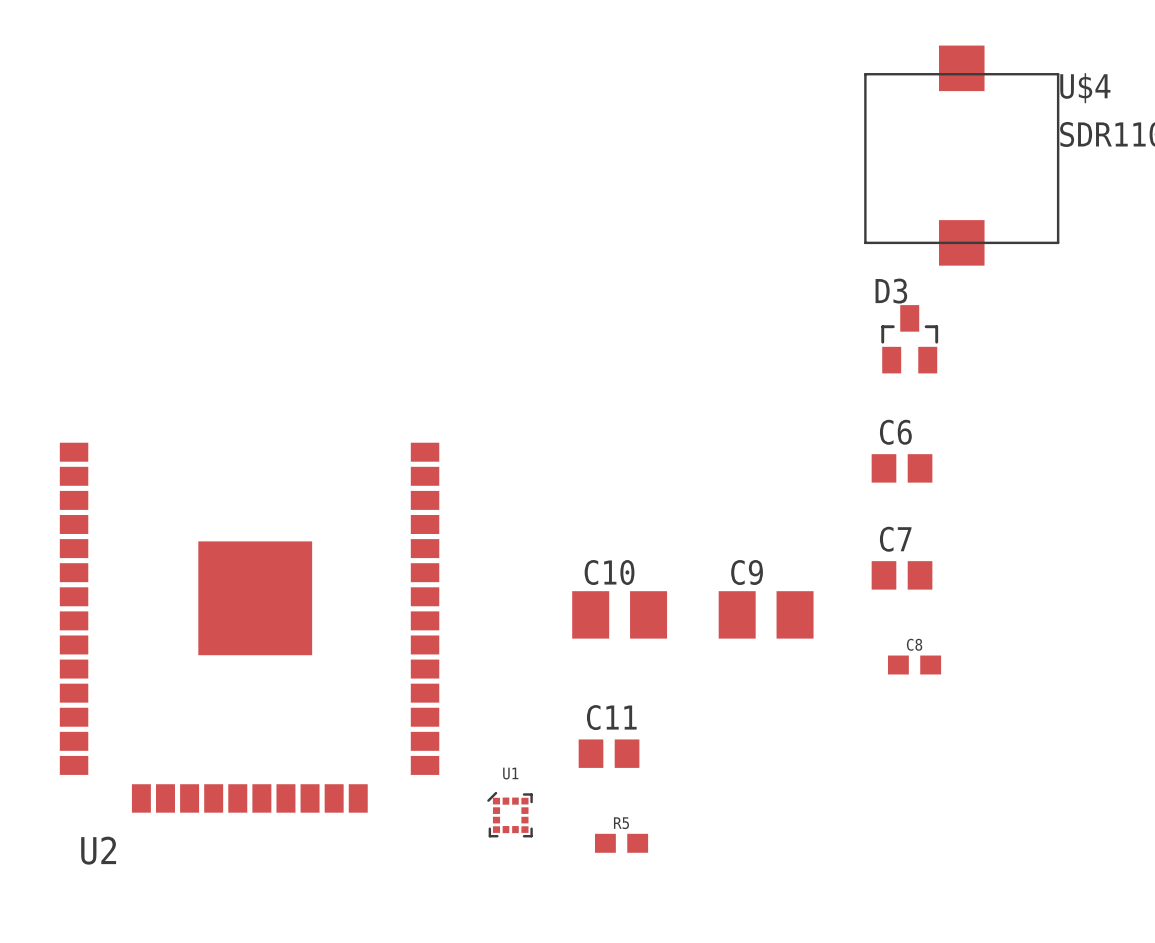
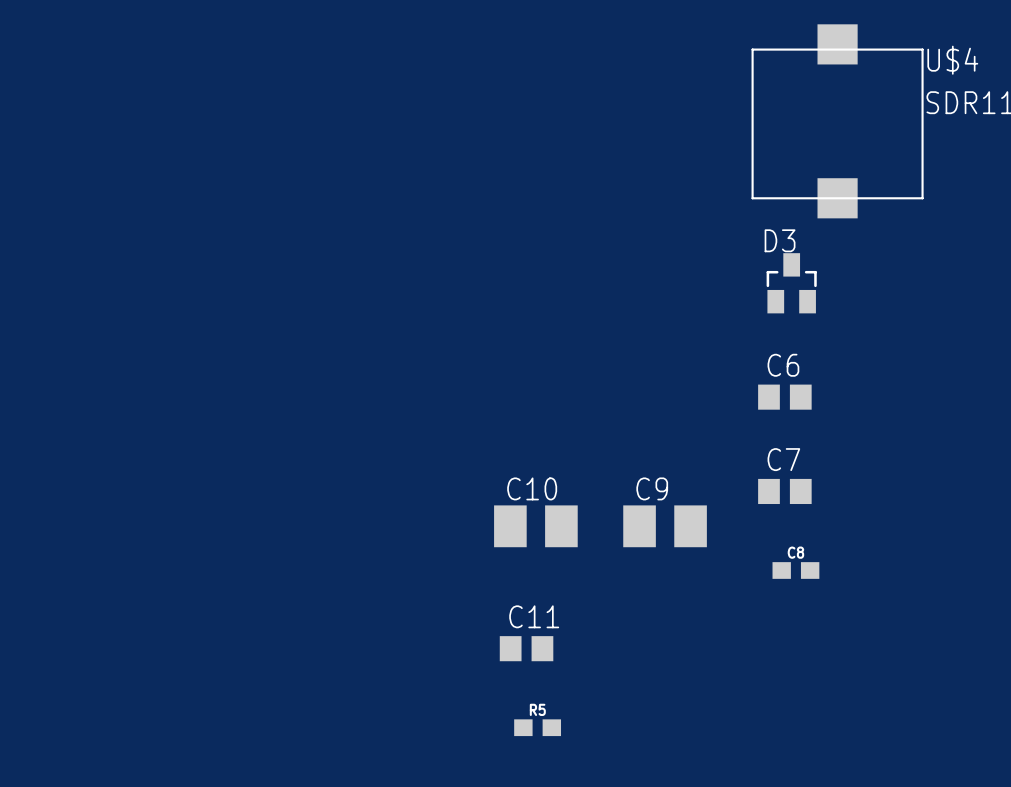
U2: (249, 627) -> none
U1: (510, 814) -> none

